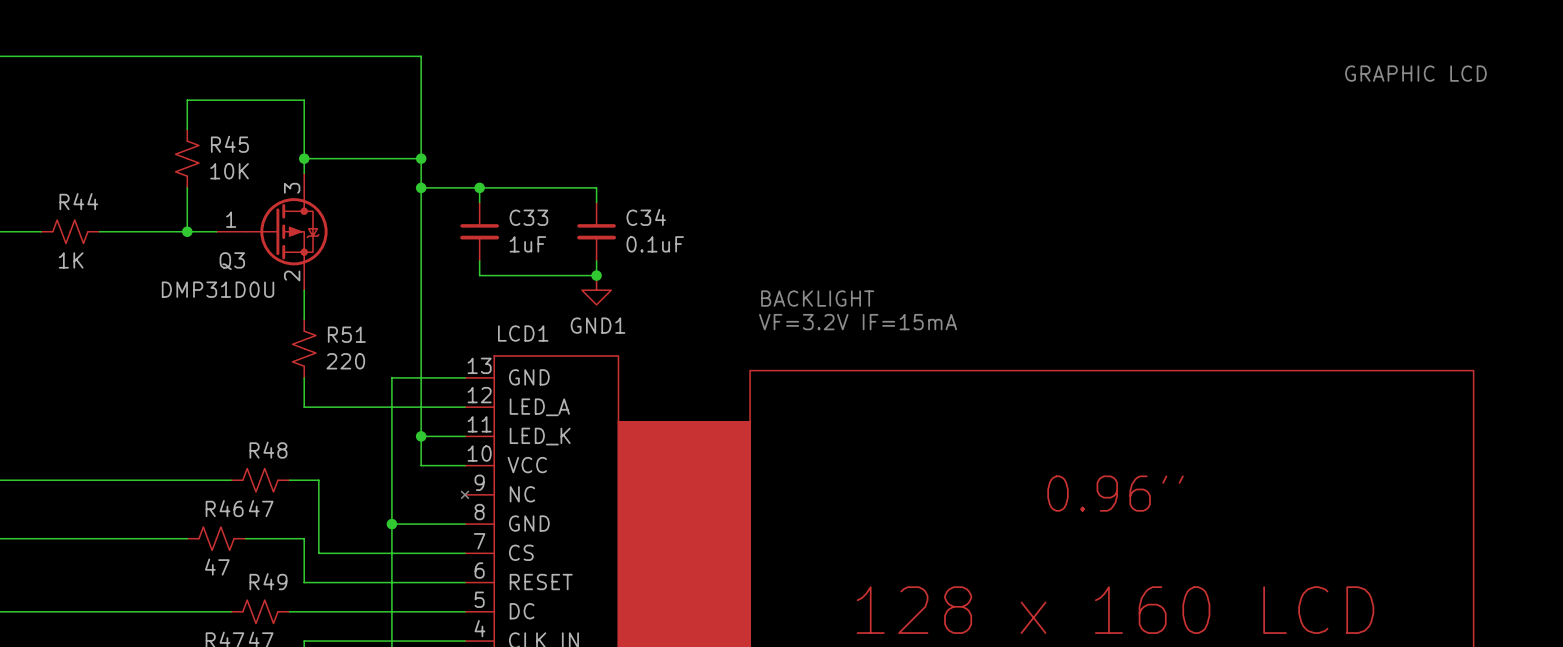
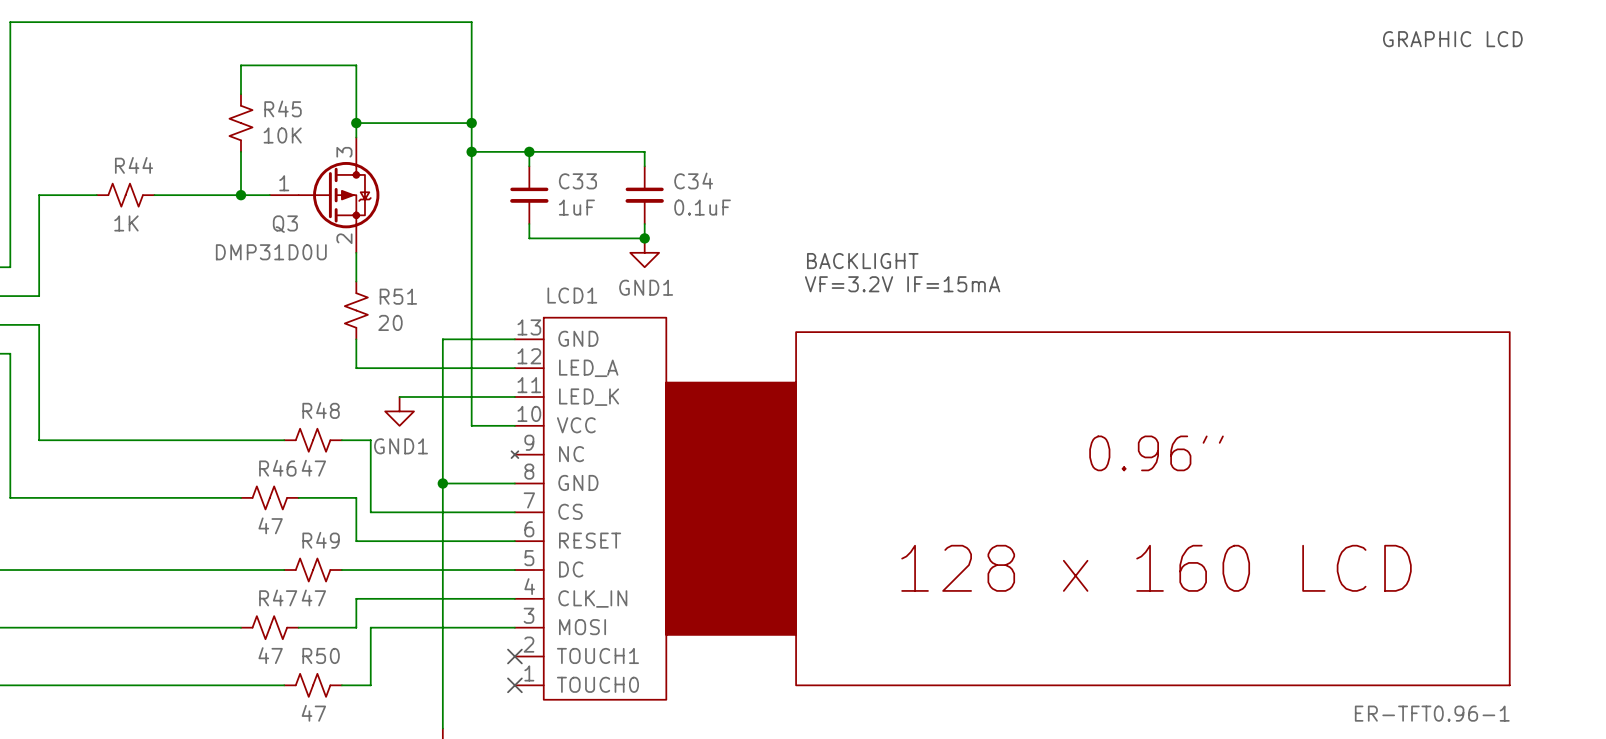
R51 value: 220 (345, 361) -> 20 (390, 322)
wire: none -> (399, 396) (471, 396)
junction: (421, 436) -> none
power symbol: none -> GND1 (399, 411)

